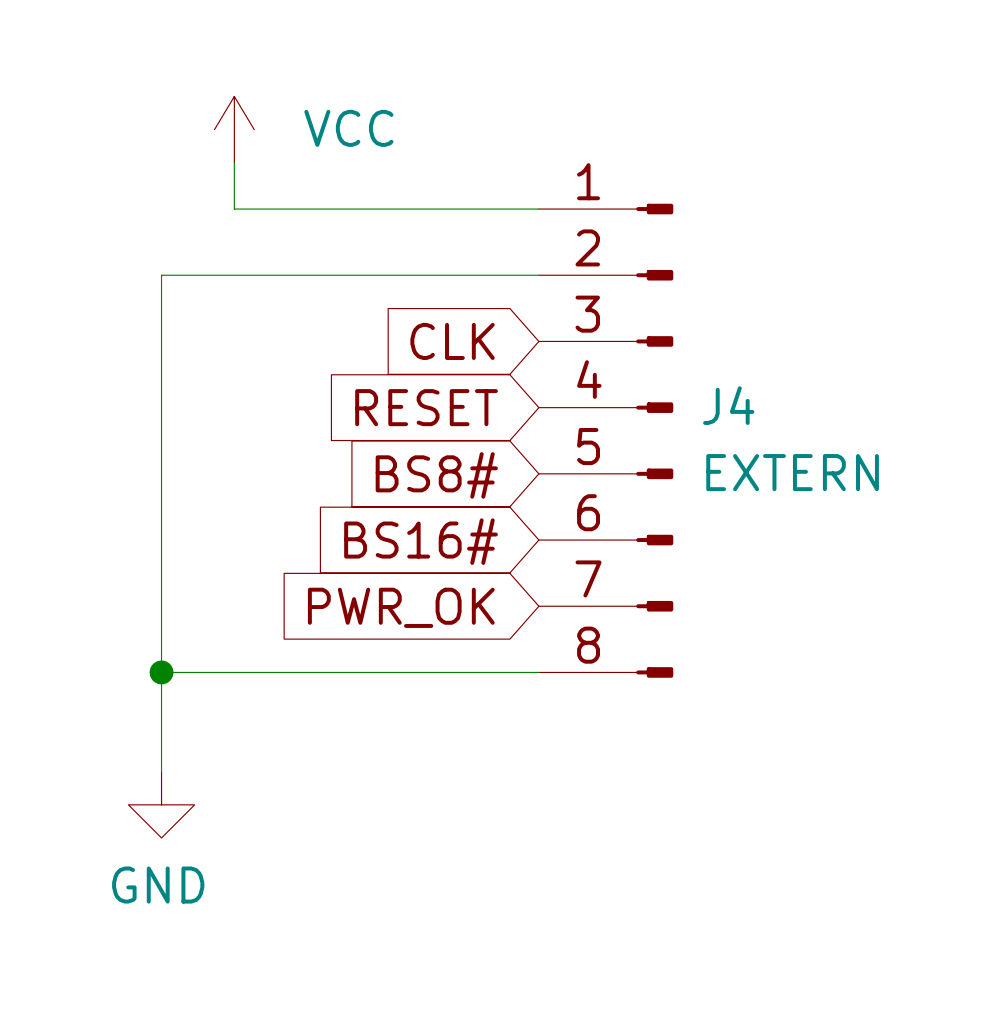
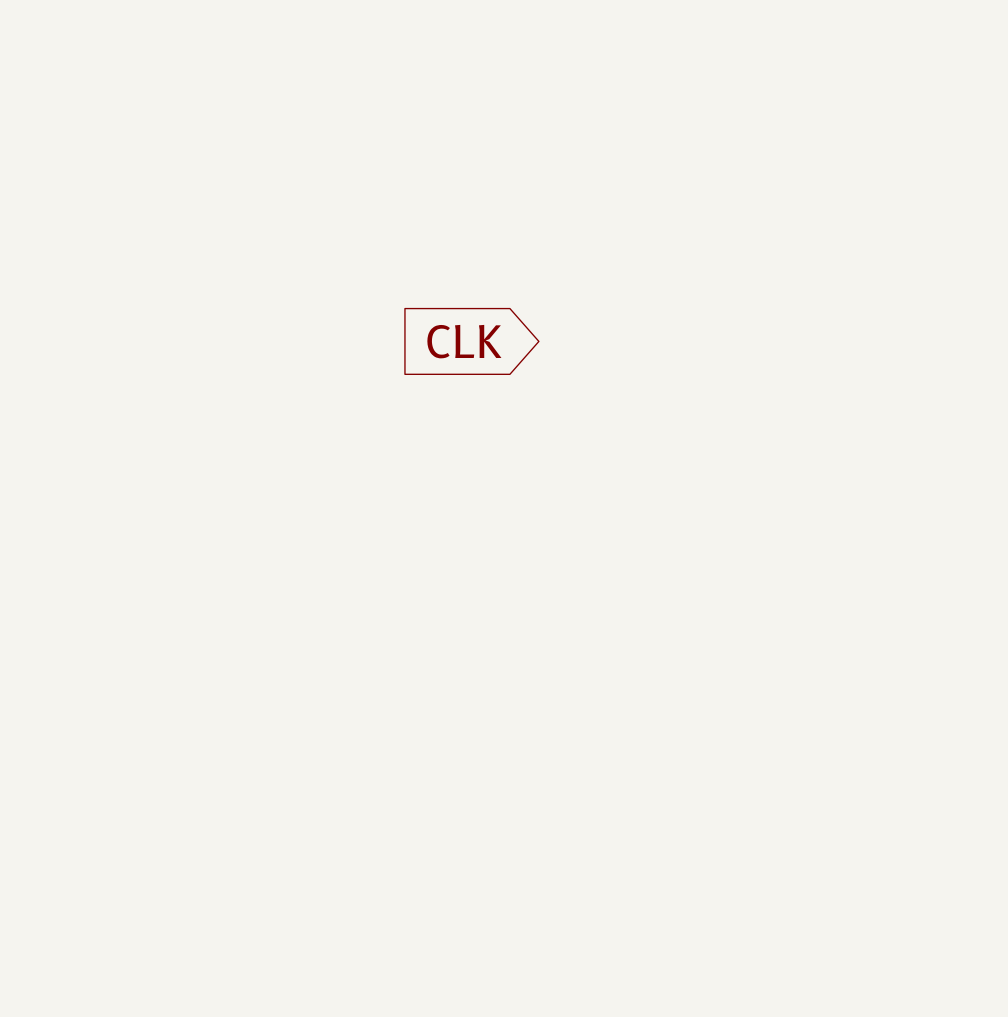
power symbol: VCC (234, 129) -> none
wire: (234, 162) (234, 209) (538, 209) -> none
wire: (538, 275) (161, 275) (161, 771) -> none
global label: RESET (426, 407) -> none
J4: EXTERN (606, 440) -> none
global label: BS8# (436, 475) -> none
global label: BS16# (421, 541) -> none
global label: PWR_OK (401, 607) -> none
wire: (161, 672) (538, 672) -> none
junction: (161, 672) -> none
power symbol: GND (161, 804) -> none

